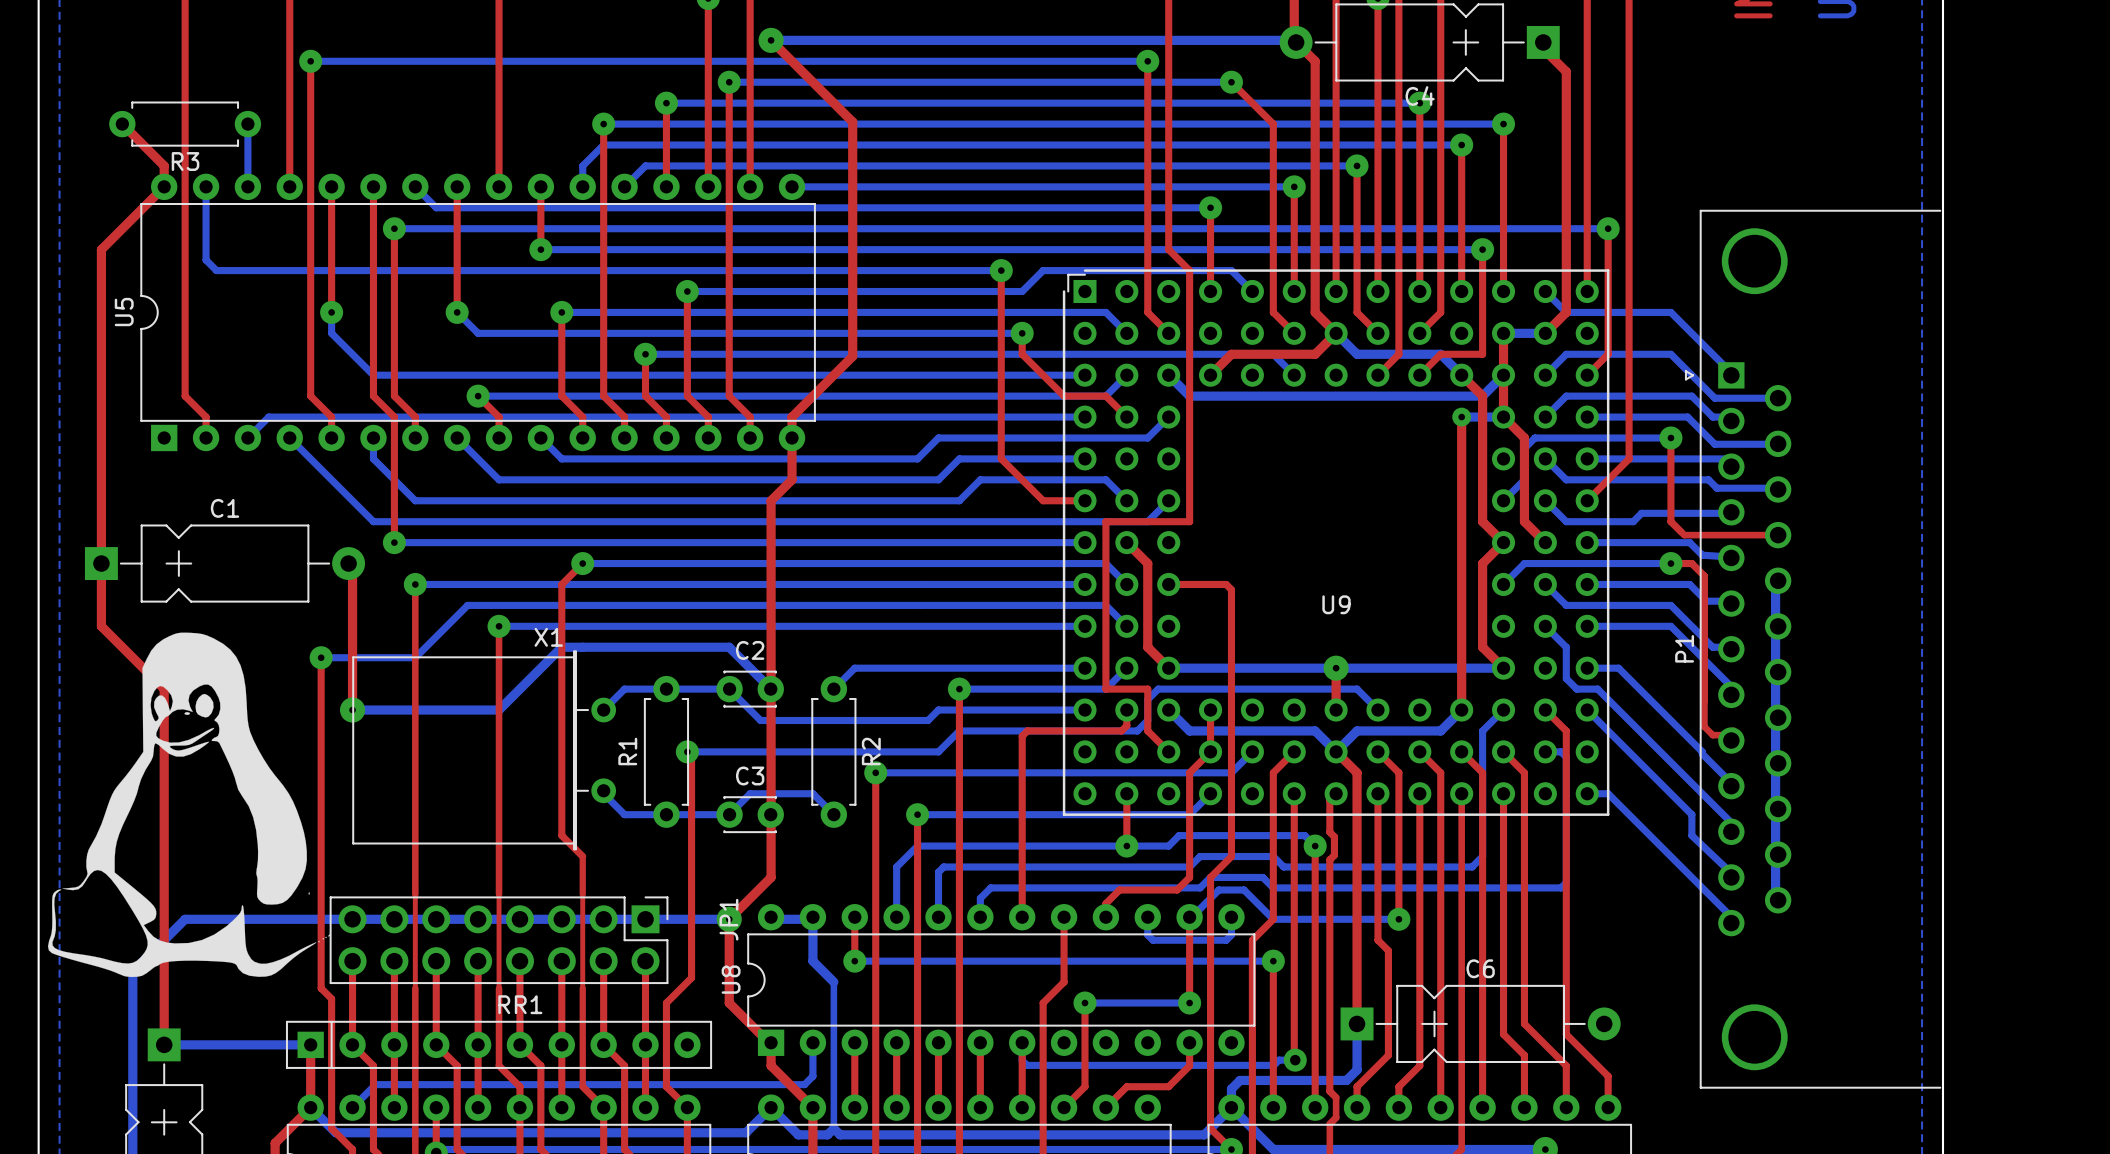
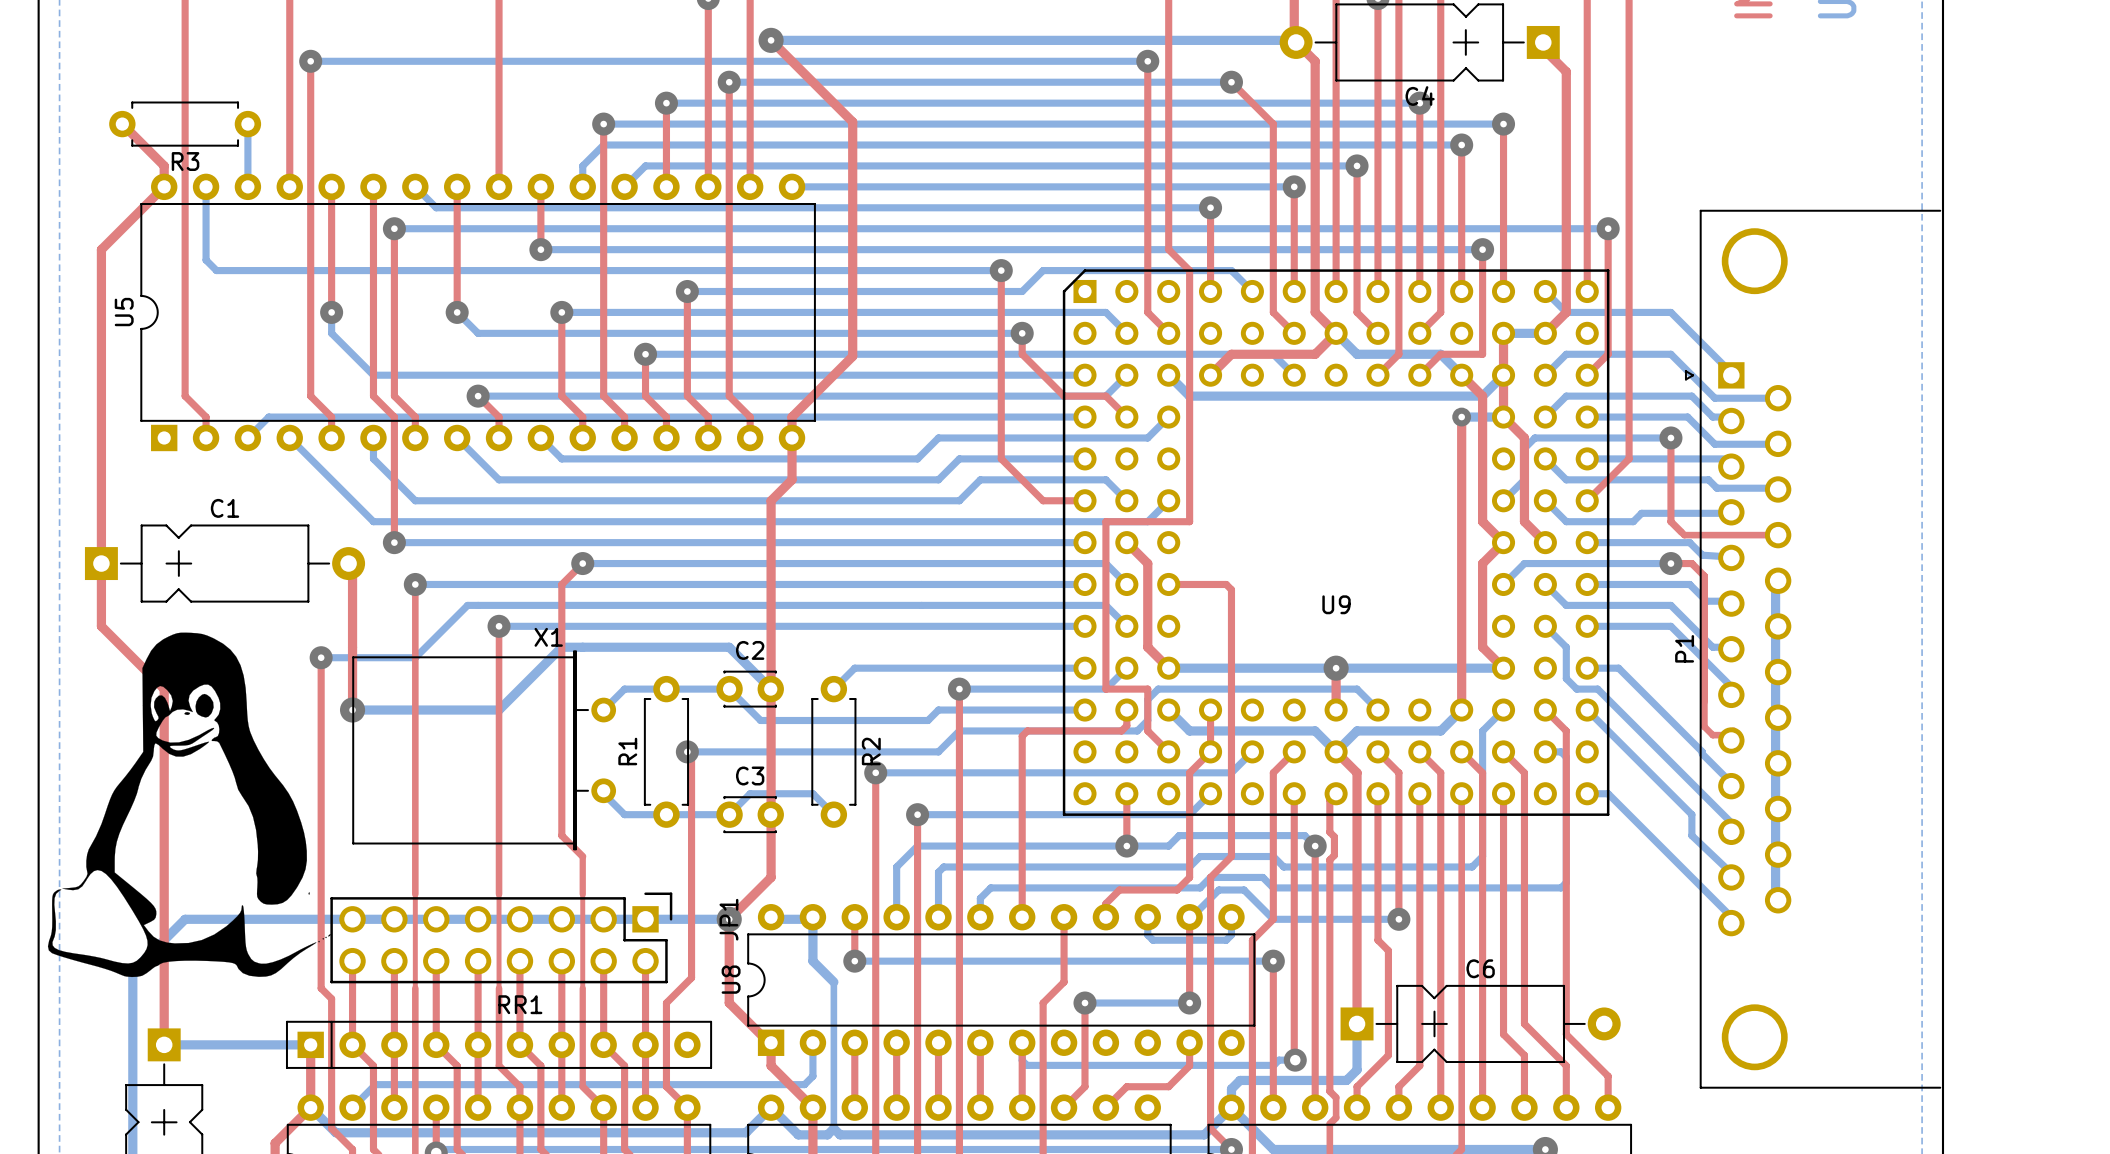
U9 footprint: [1062, 269, 1610, 816] -> [1062, 269, 1610, 816]
JP1 footprint: [329, 896, 669, 985] -> [330, 892, 673, 984]

